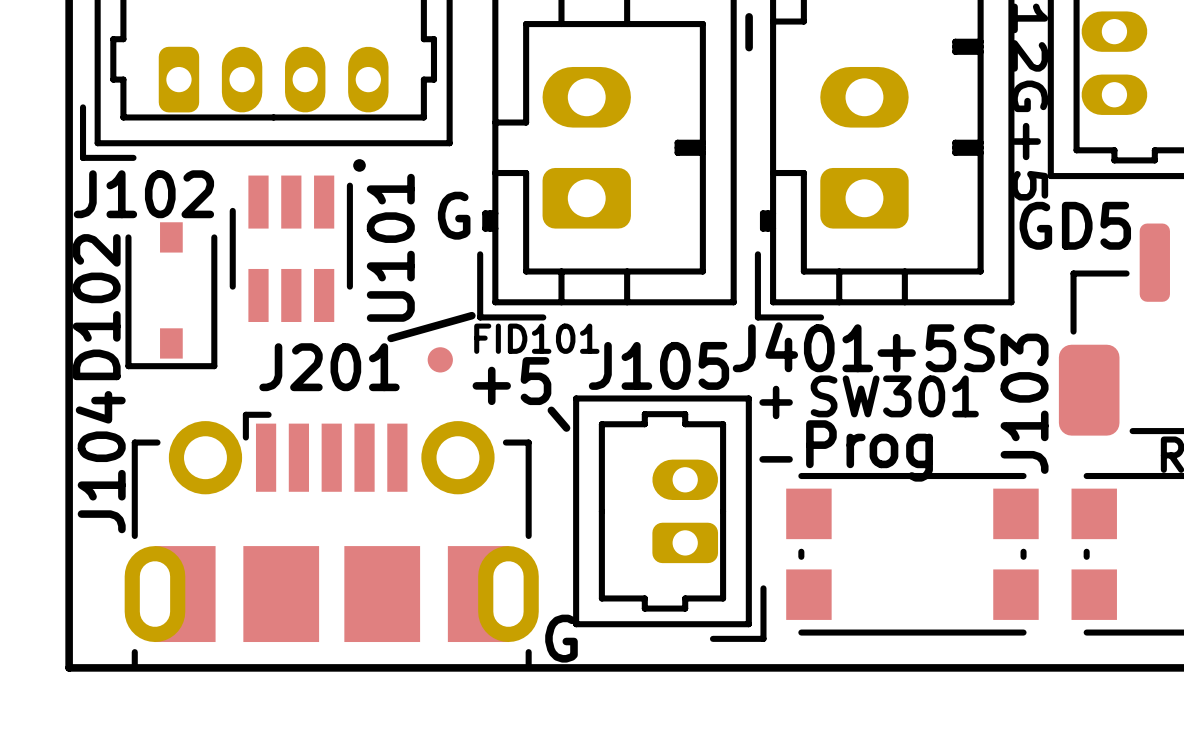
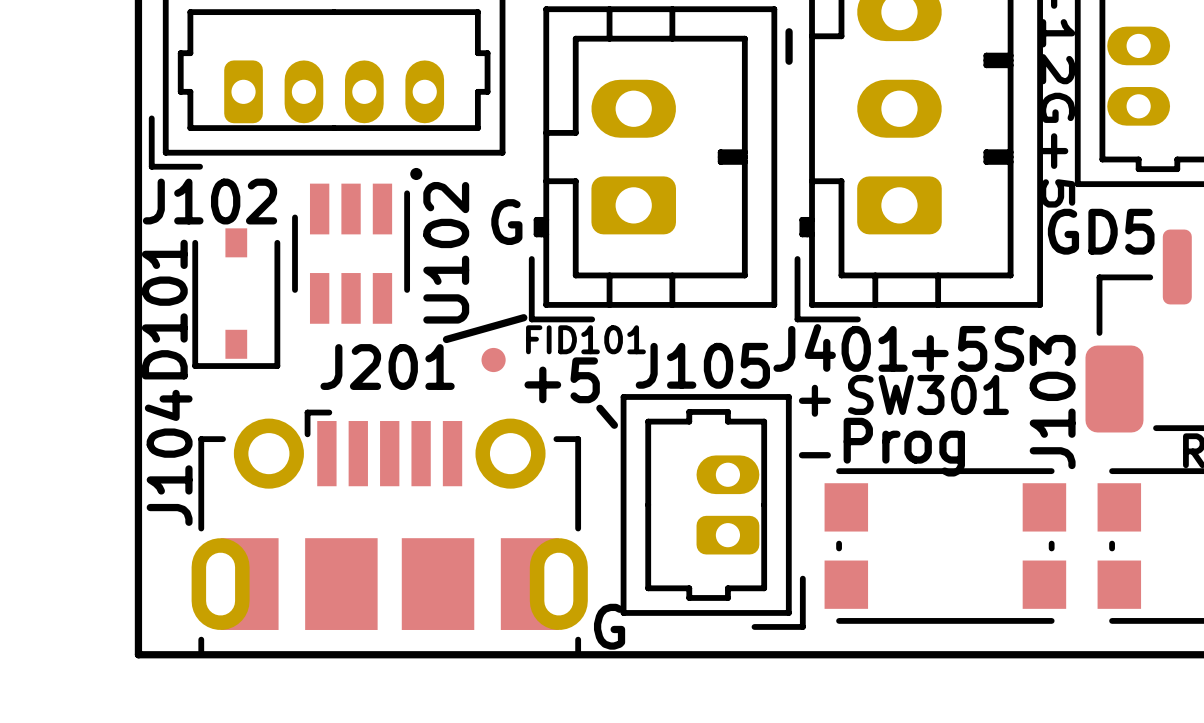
U101 name: U101 (390, 247) -> U102 (446, 252)
D102 name: D102 (96, 307) -> D101 (164, 309)

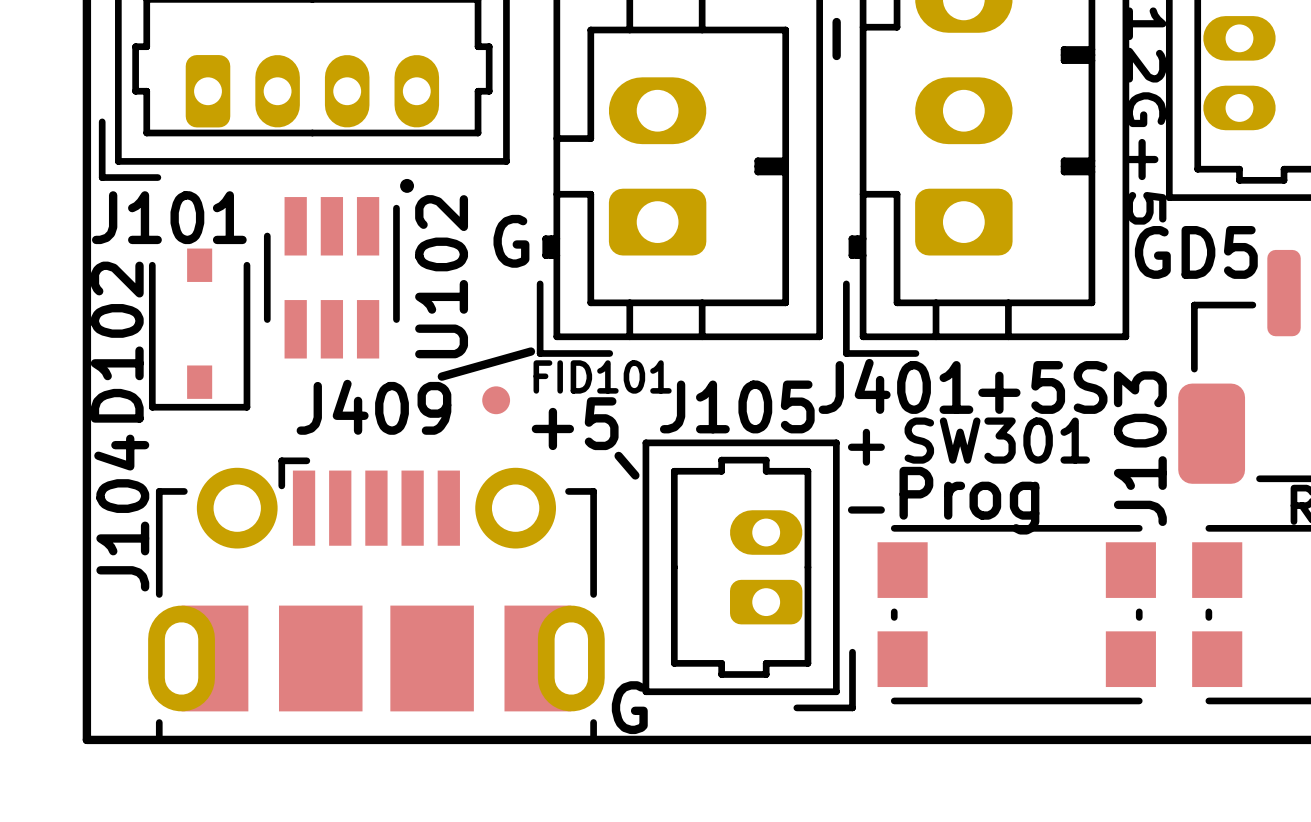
J102 name: J102 (210, 201) -> J101 (169, 217)
D101 name: D101 (164, 309) -> D102 (117, 342)
J201 name: J201 (387, 367) -> J409 (373, 407)

